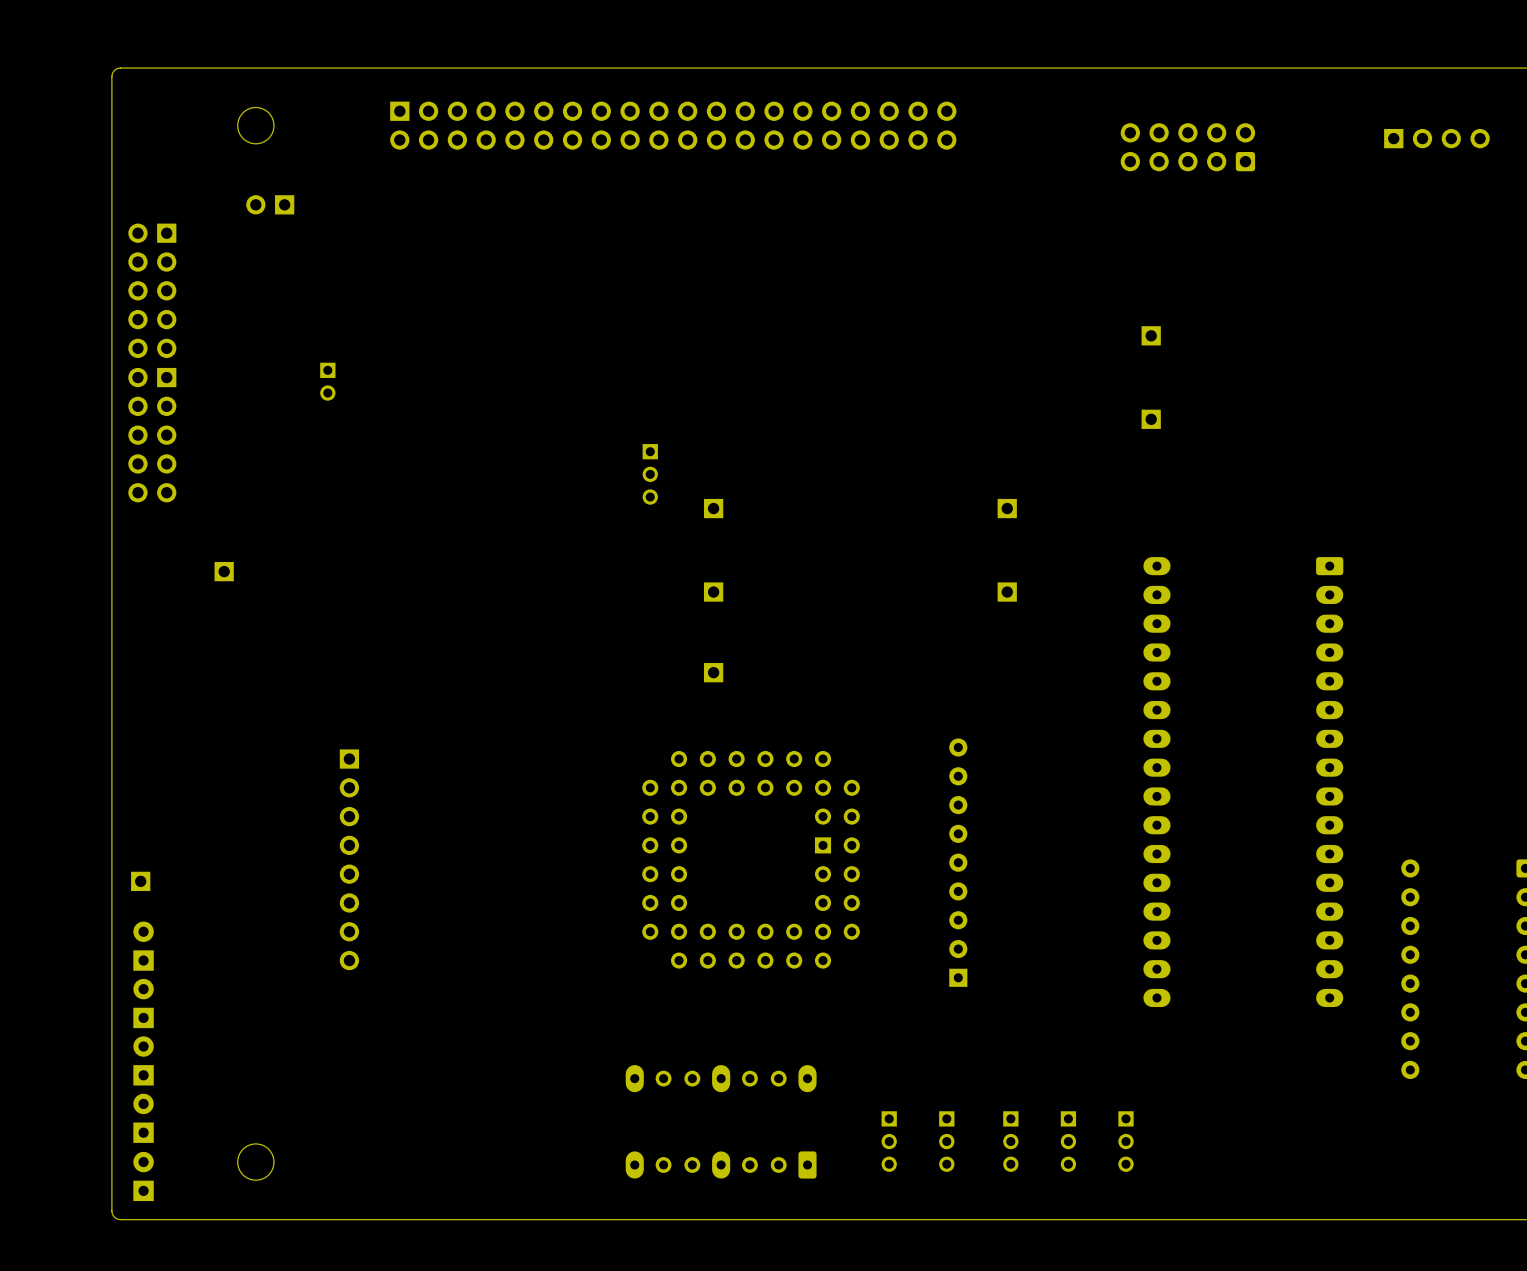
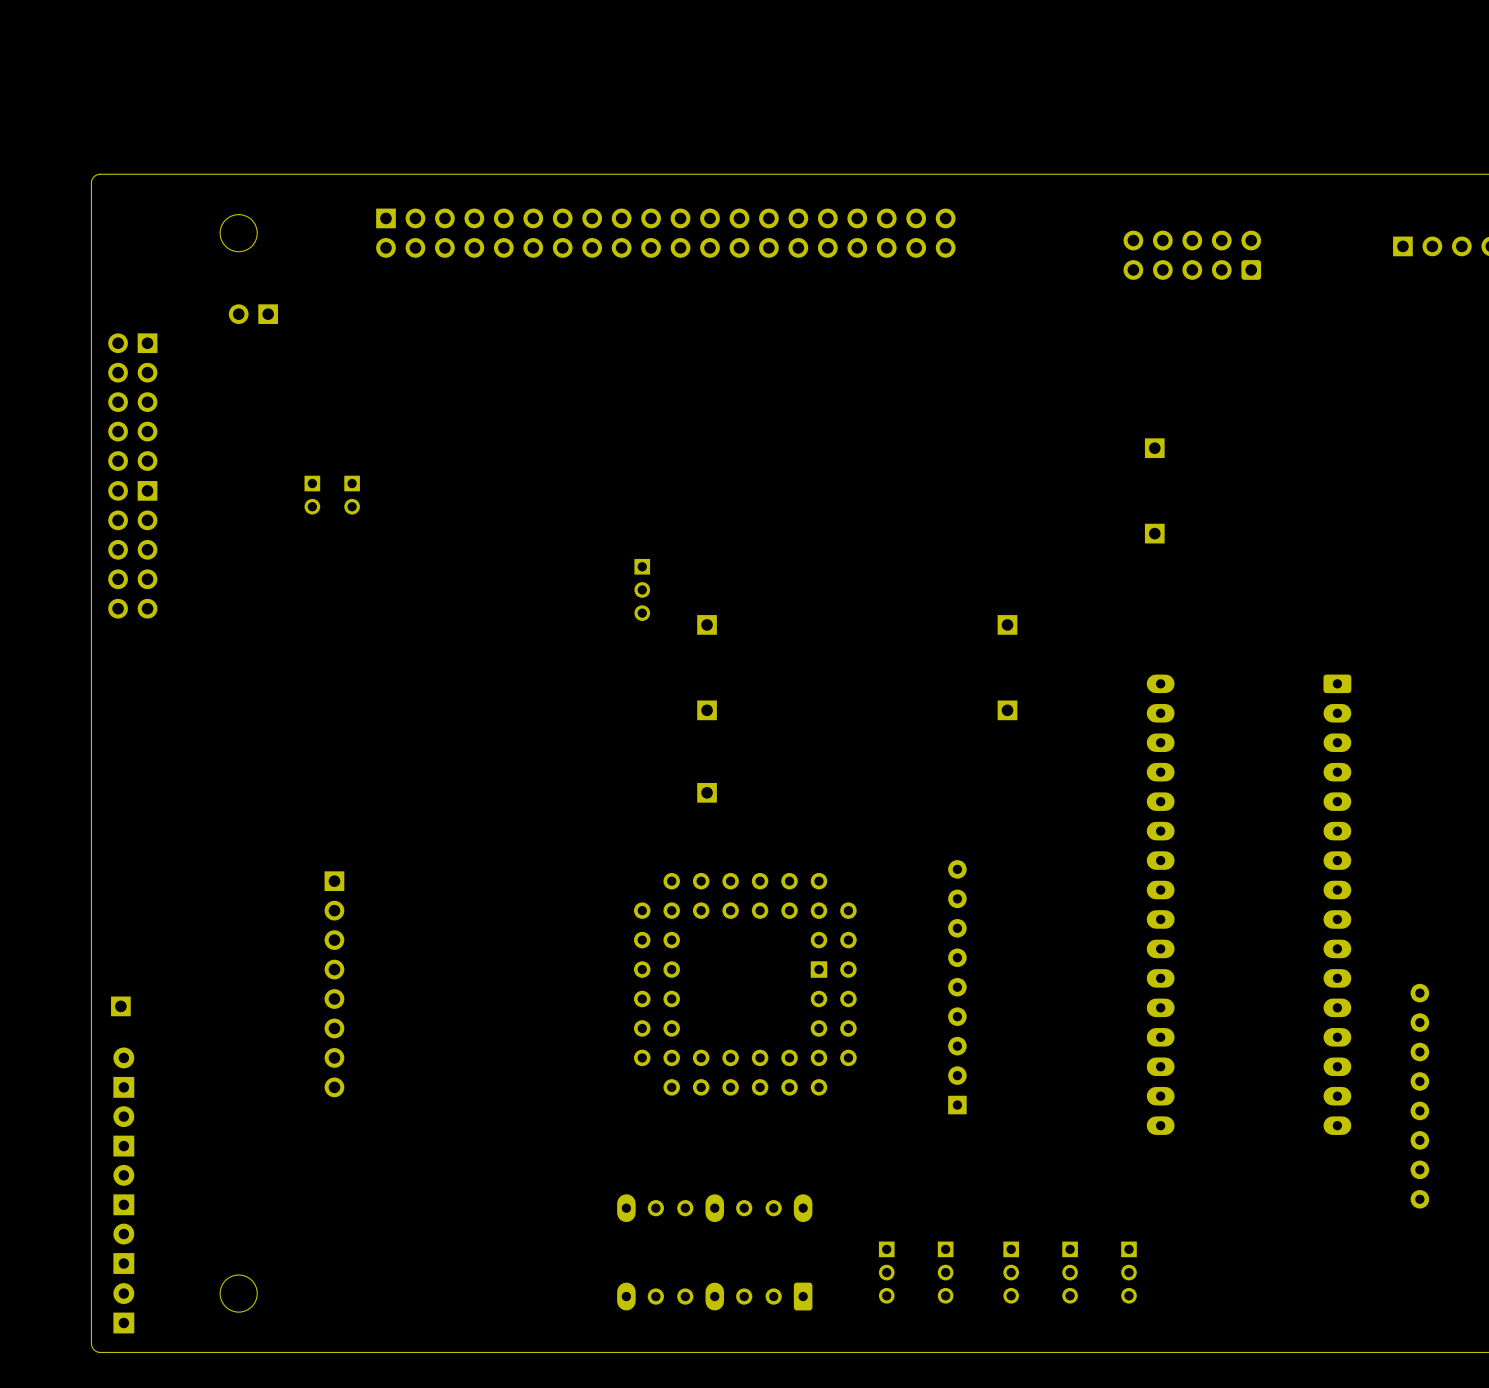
part: none -> (352, 495)
part: (224, 571) -> none

